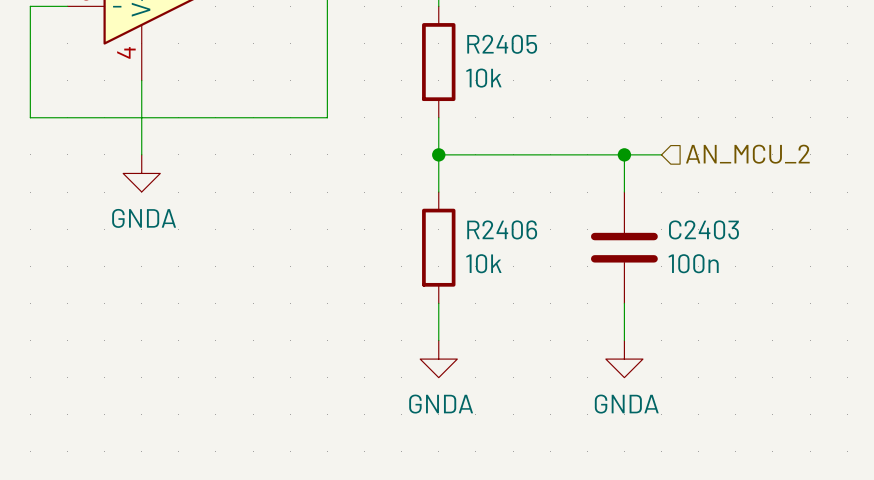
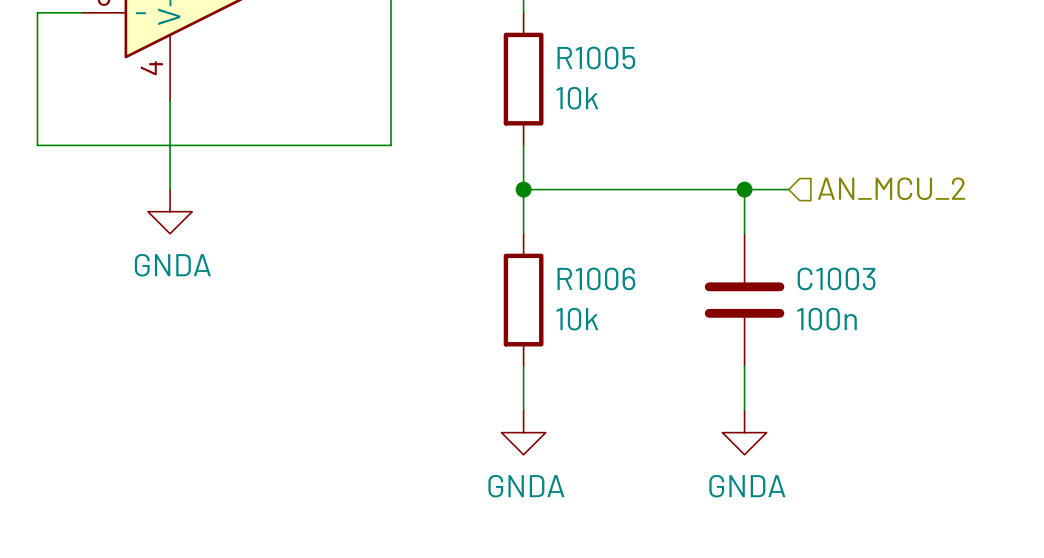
R2405 name: R2405 (502, 44) -> R1005 (596, 57)
R2406 name: R2406 (502, 229) -> R1006 (596, 278)
C2403 name: C2403 (703, 229) -> C1003 (836, 278)

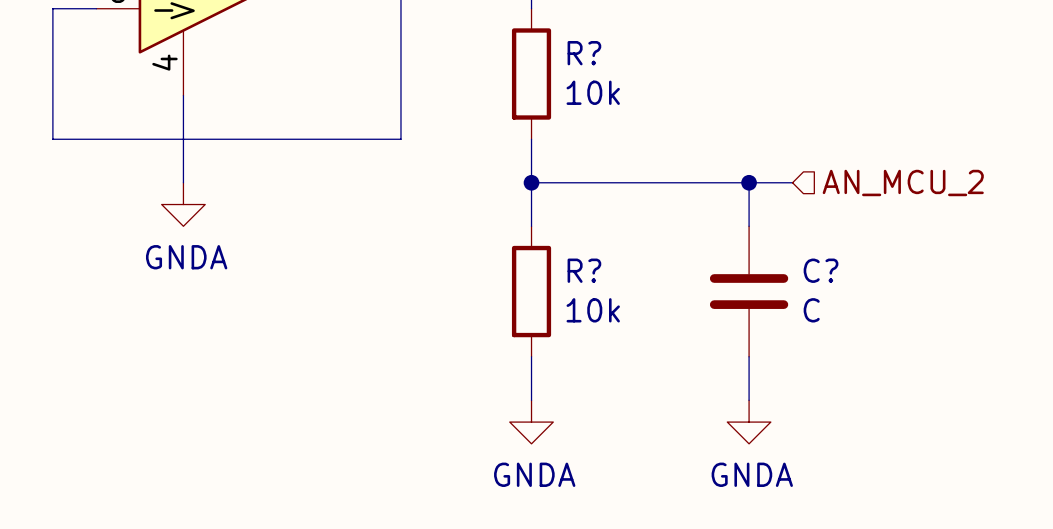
R1005 name: R1005 (596, 57) -> R? (584, 53)
R1006 name: R1006 (596, 278) -> R? (584, 270)
C1003 name: C1003 (836, 278) -> C? (821, 270)
C1003 value: 100n (826, 319) -> C (811, 310)

